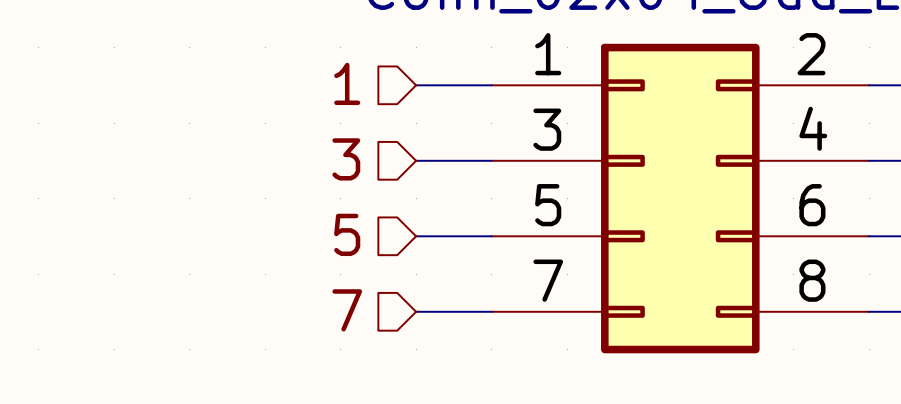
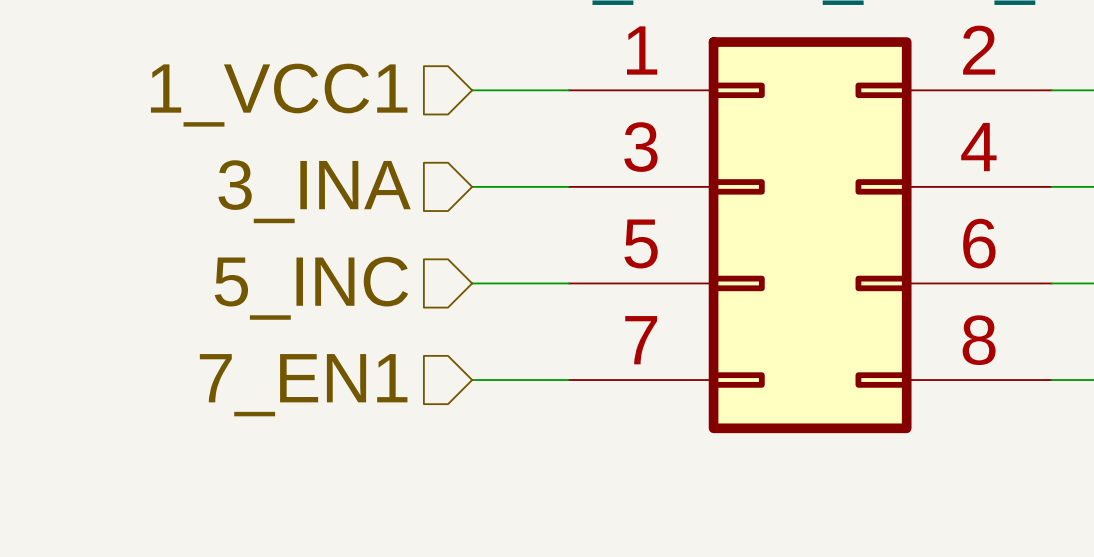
hierarchical label: 1 (347, 83) -> 1_VCC1 (279, 95)
hierarchical label: 3 (346, 159) -> 3_INA (314, 191)
hierarchical label: 5 (347, 234) -> 5_INC (311, 288)
hierarchical label: 7 (347, 310) -> 7_EN1 (303, 385)

